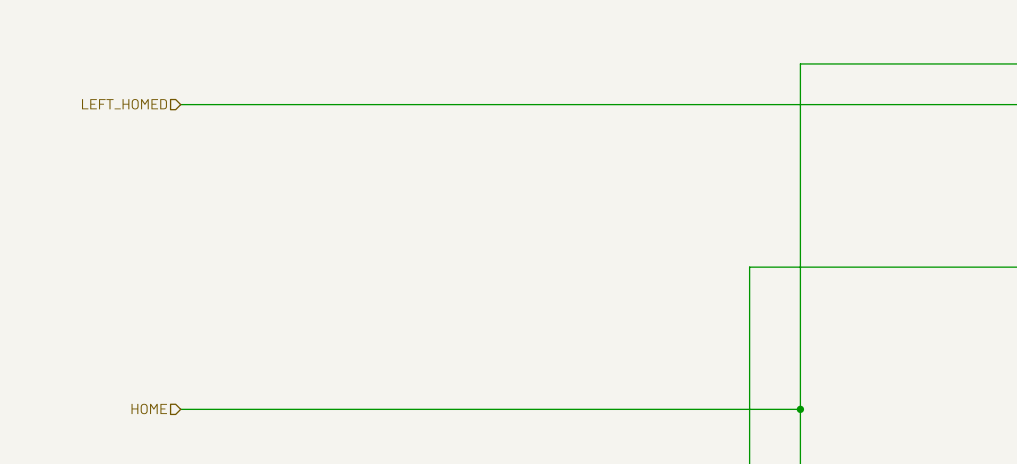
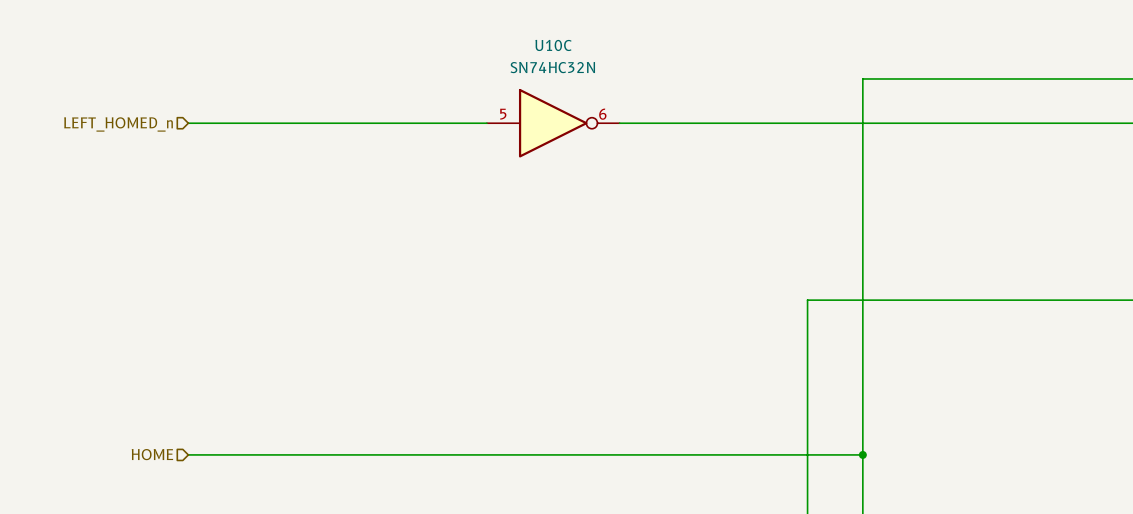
hierarchical label: LEFT_HOMED (124, 104) -> LEFT_HOMED_n (118, 124)
U10C: none -> SN74HC32N (553, 123)

